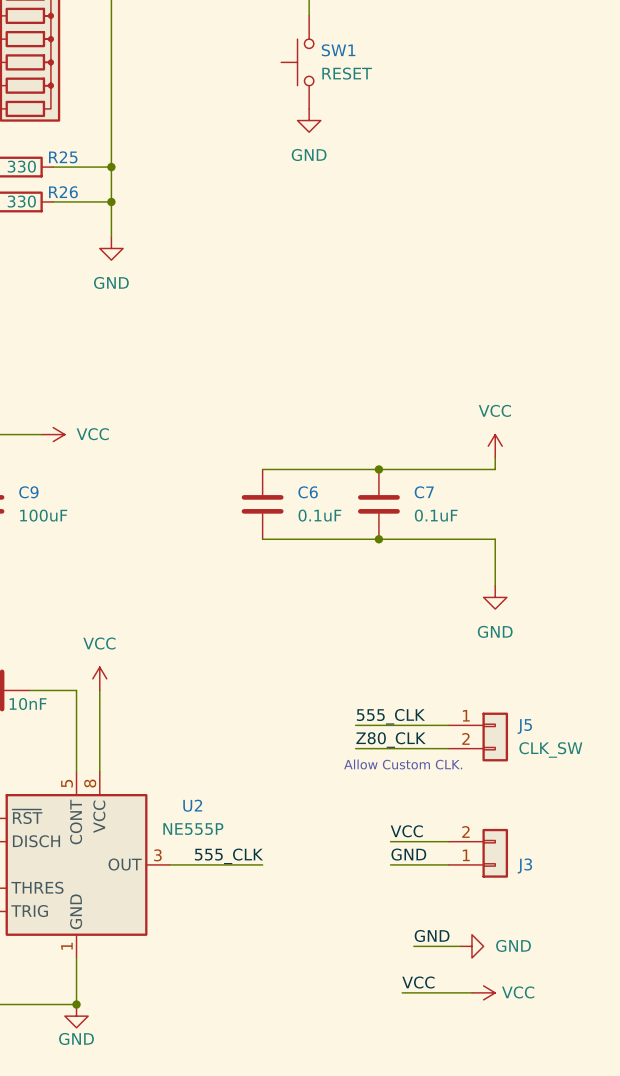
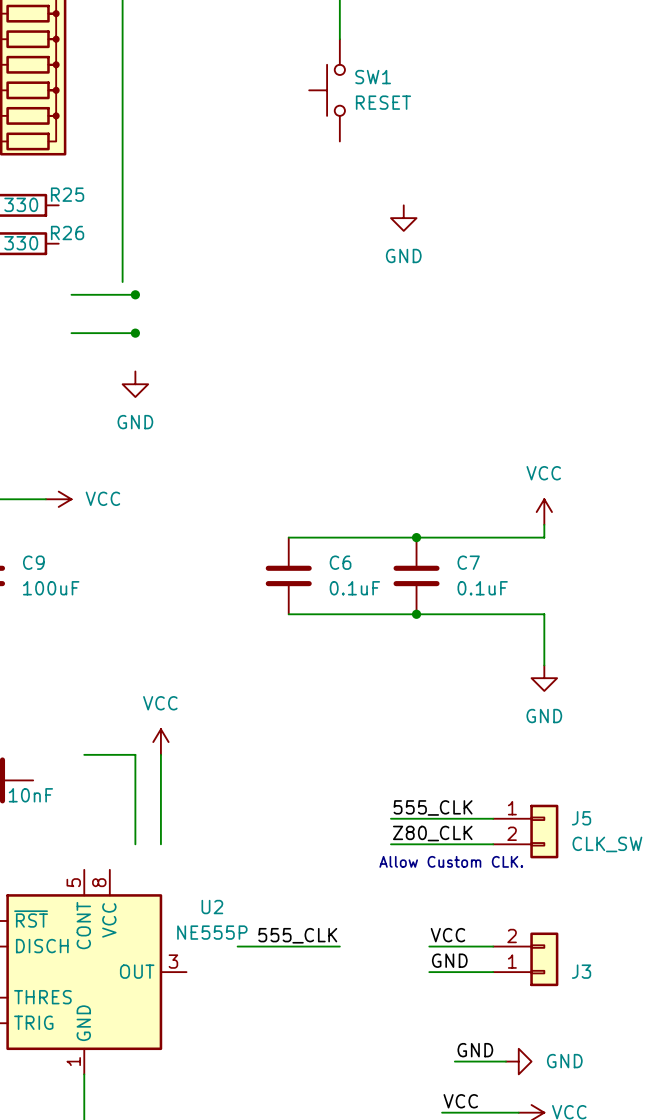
power symbol position: GND (309, 120) -> GND (403, 218)
wire: (53, 167) (111, 167) -> (71, 294) (135, 294)
junction: (111, 167) -> none
wire: (53, 201) (111, 201) -> (71, 333) (135, 333)
junction: (111, 201) -> none
power symbol position: GND (111, 248) -> GND (135, 384)
junction: none -> (135, 294)
junction: none -> (135, 333)
power symbol position: VCC (99, 678) -> VCC (160, 742)
wire: (29, 690) (76, 690) (76, 771) -> (84, 754) (135, 754) (135, 844)
wire: (99, 690) (99, 771) -> (160, 754) (160, 844)
label position: 555_CLK (228, 856) -> 555_CLK (297, 935)
wire: (169, 864) (262, 864) -> (237, 946) (339, 946)

